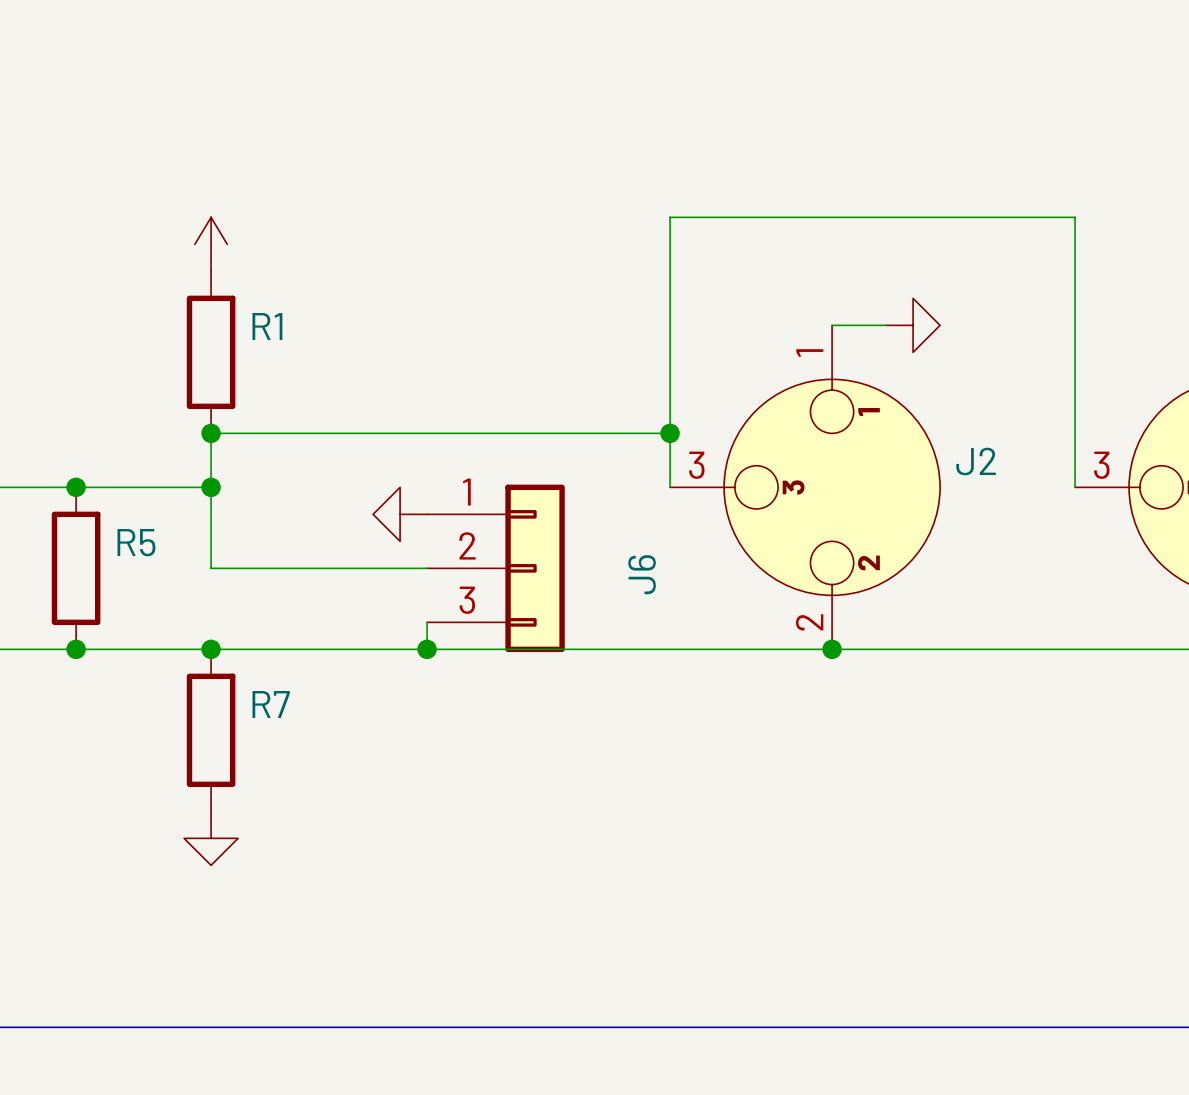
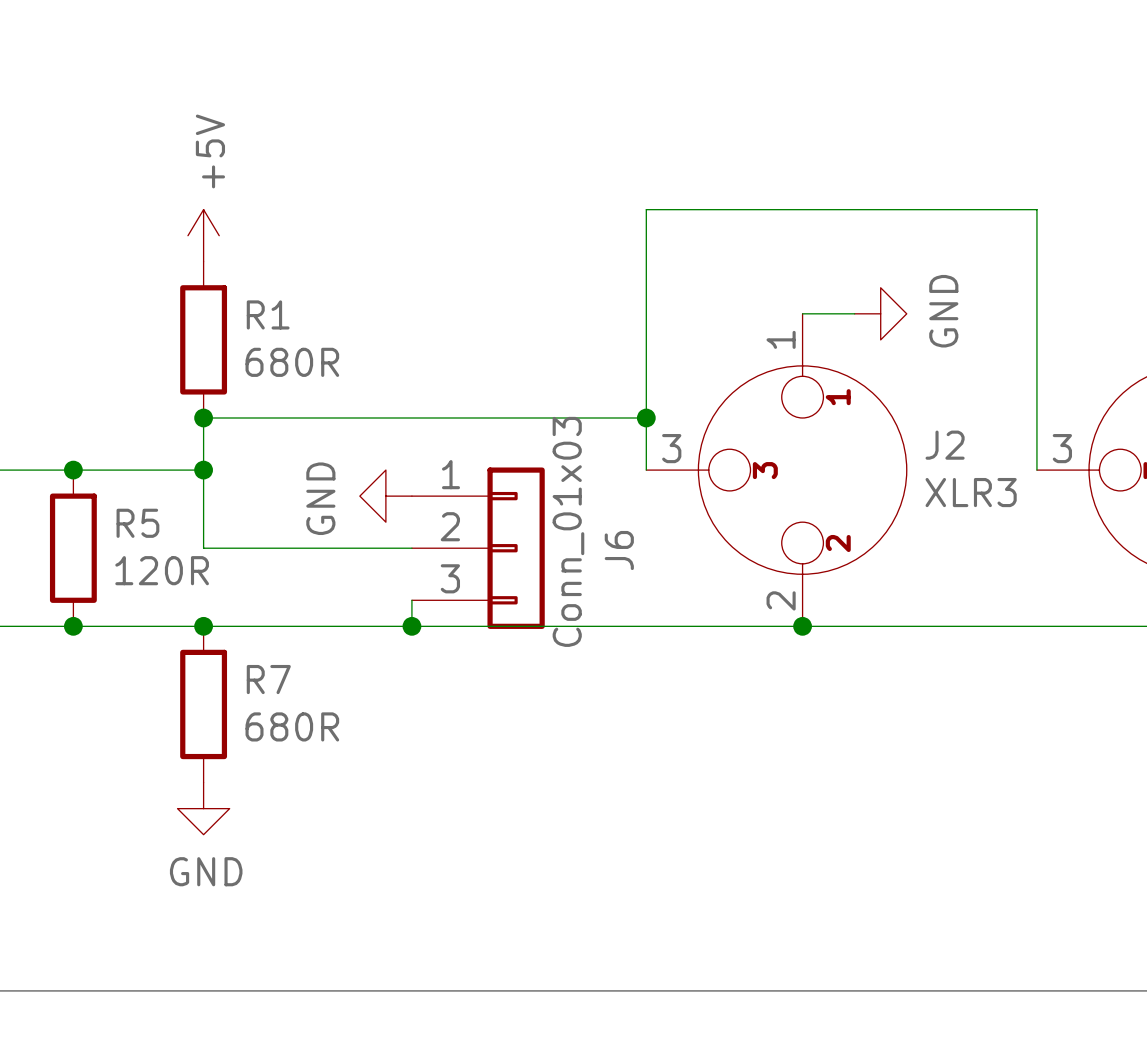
power symbol text: none -> +5V (210, 151)
power symbol text: none -> GND (943, 311)
R1 value: none -> 680R (292, 362)
J2 value: none -> XLR3 (971, 492)
power symbol text: none -> GND (320, 498)
J6 value: none -> Conn_01x03 (568, 531)
R5 value: none -> 120R (162, 570)
R7 value: none -> 680R (292, 726)
power symbol text: none -> GND (206, 871)

